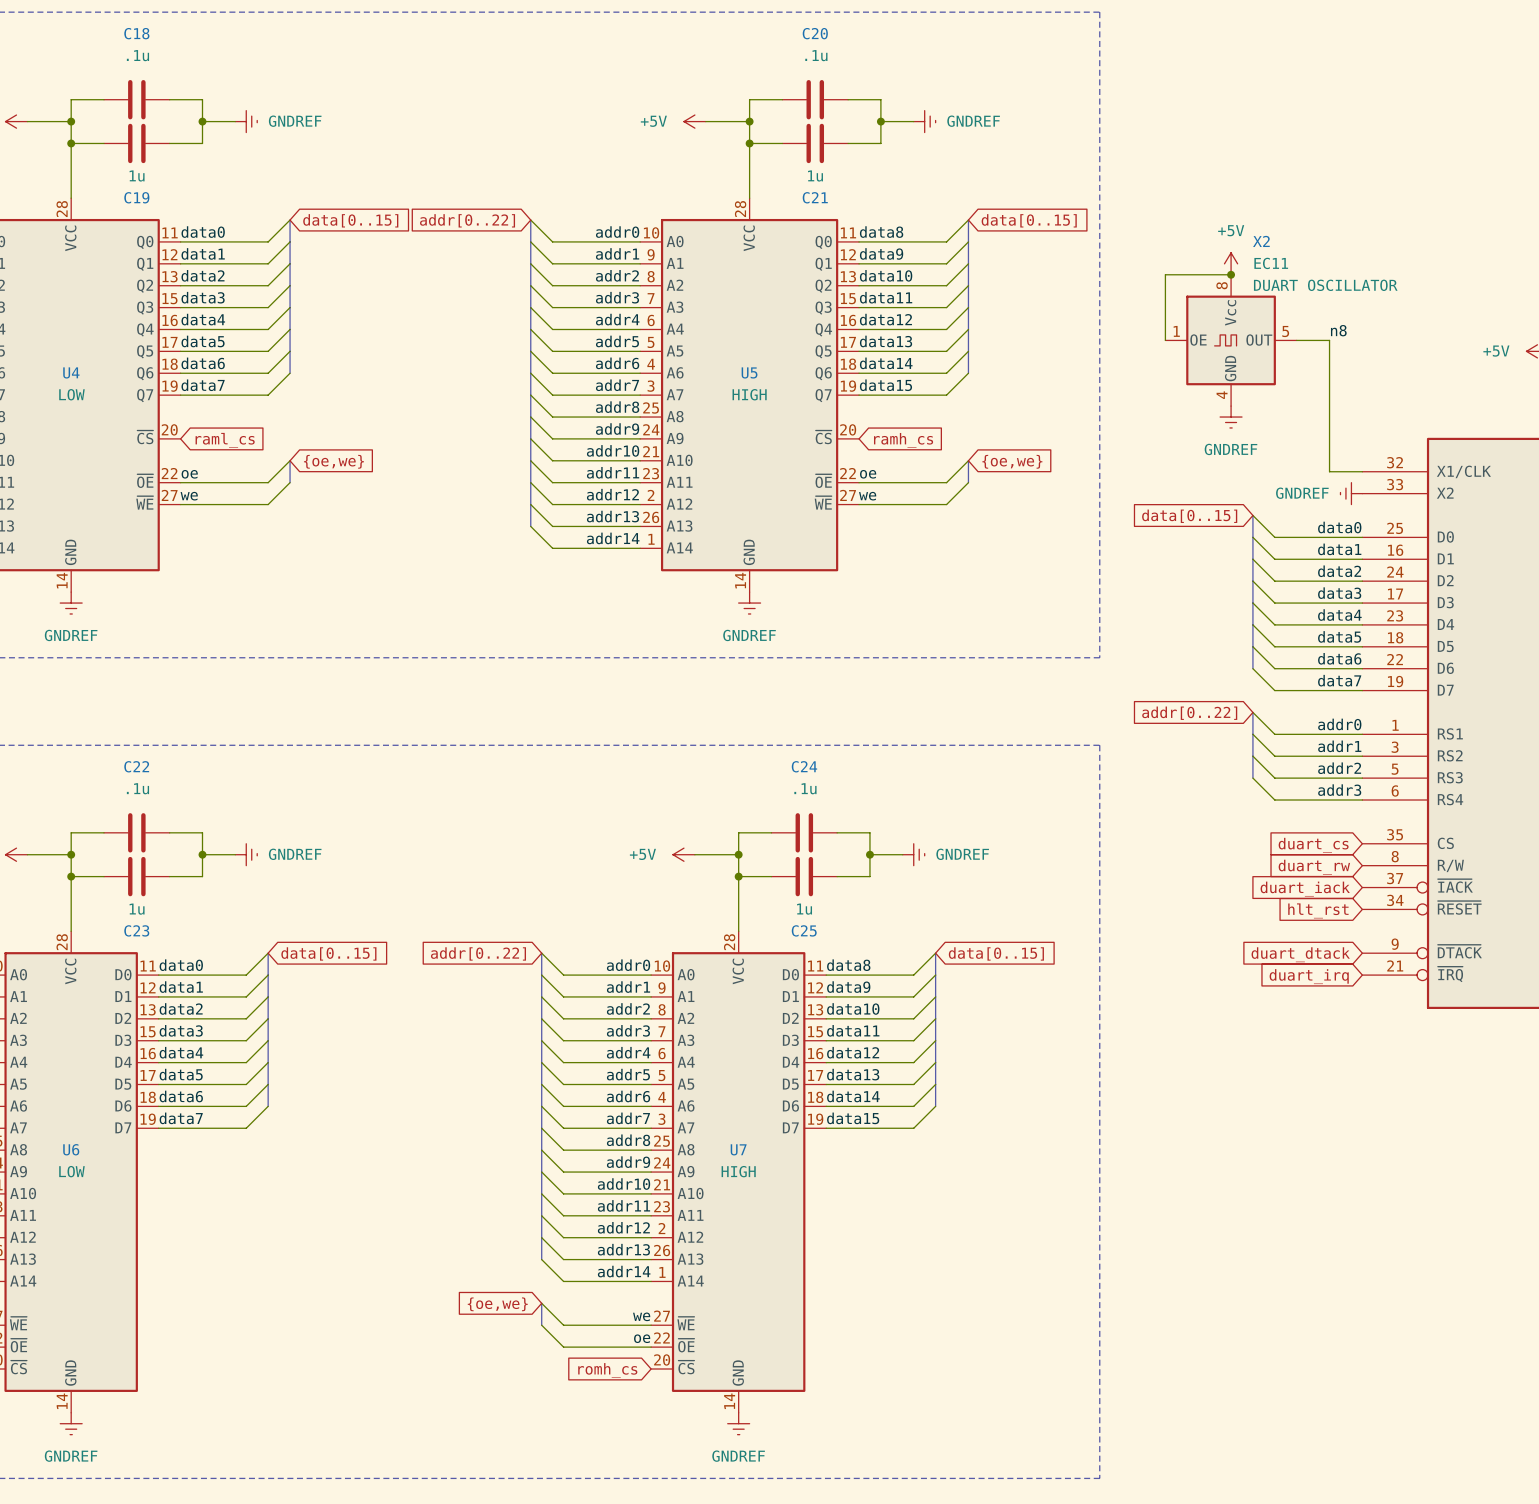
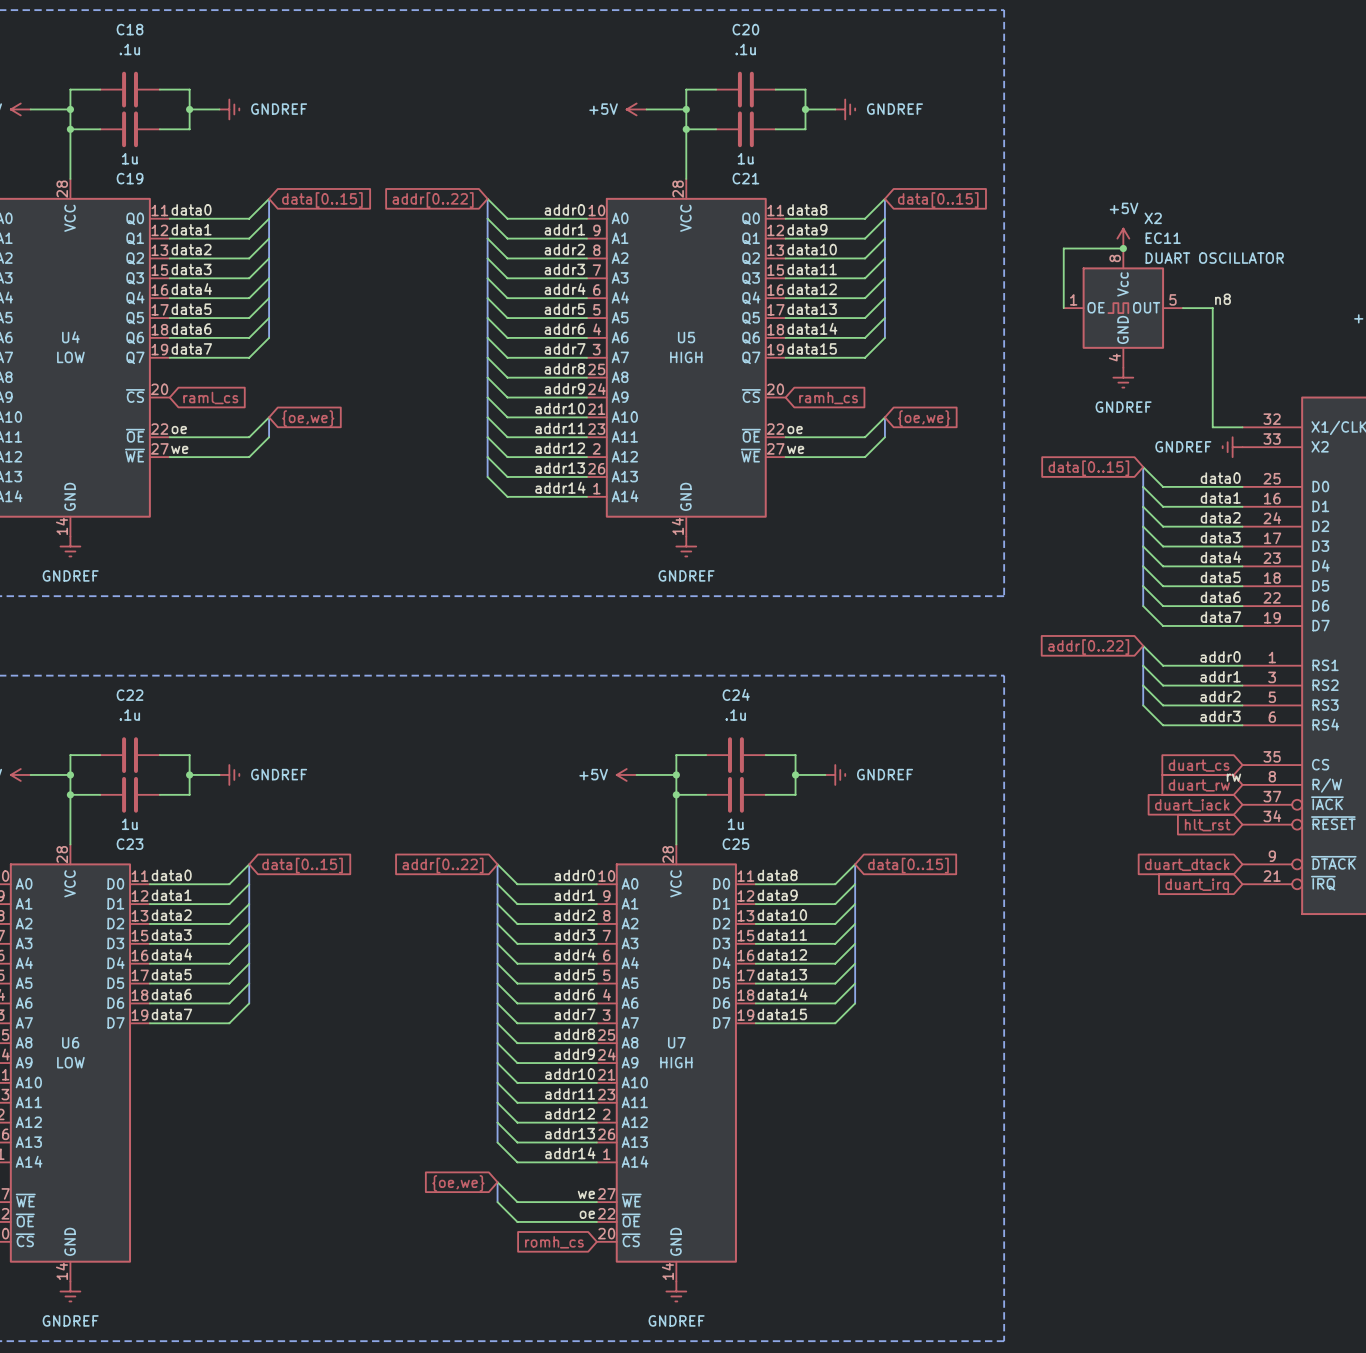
label: none -> rw (1233, 777)

